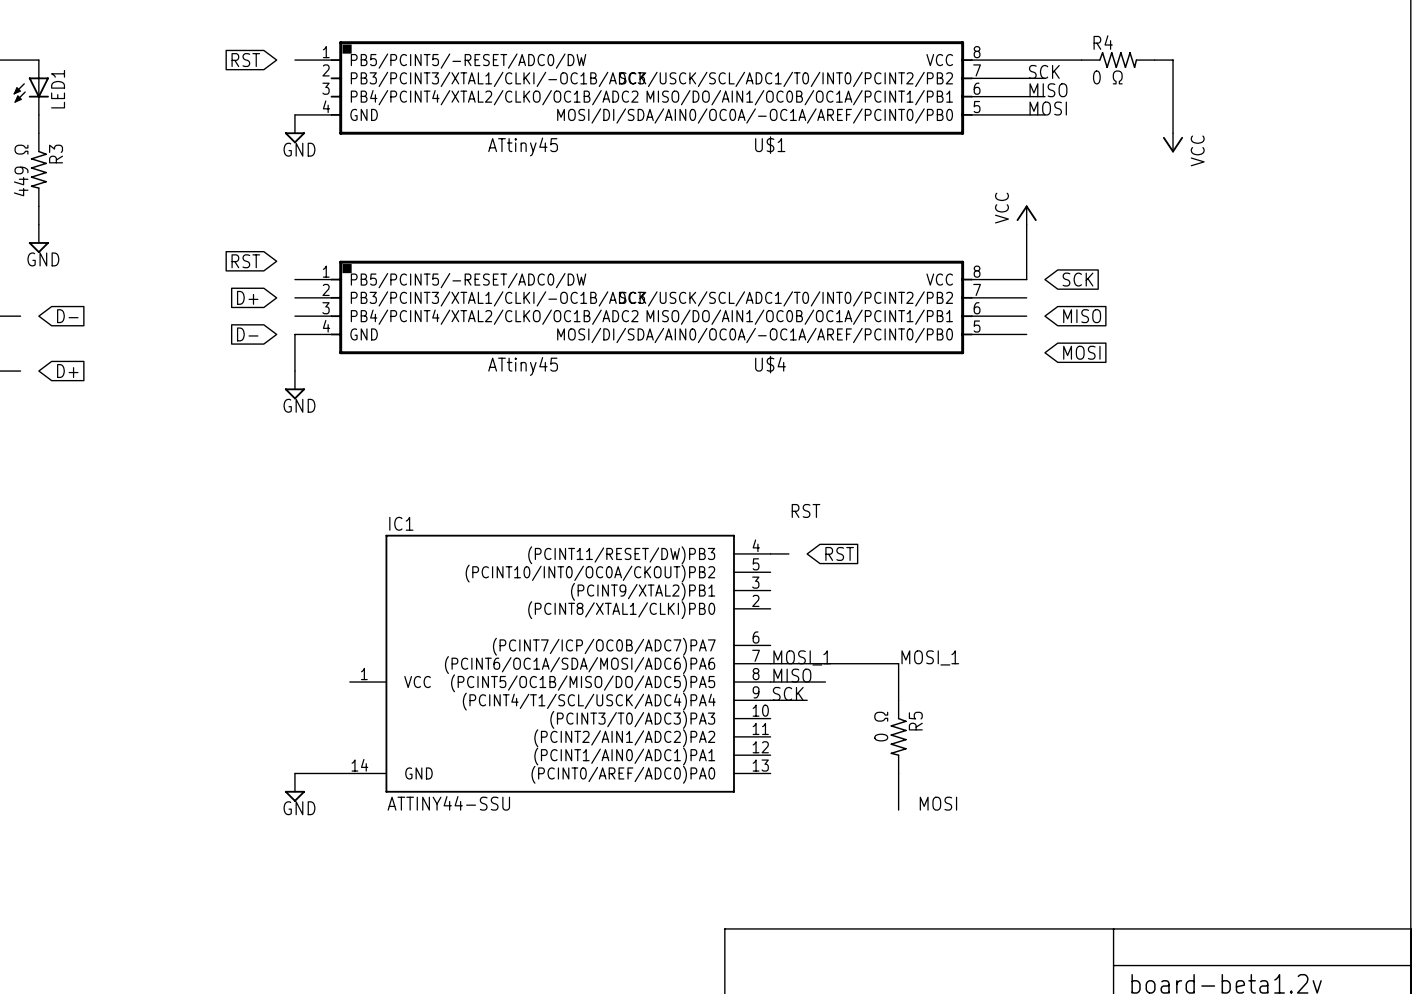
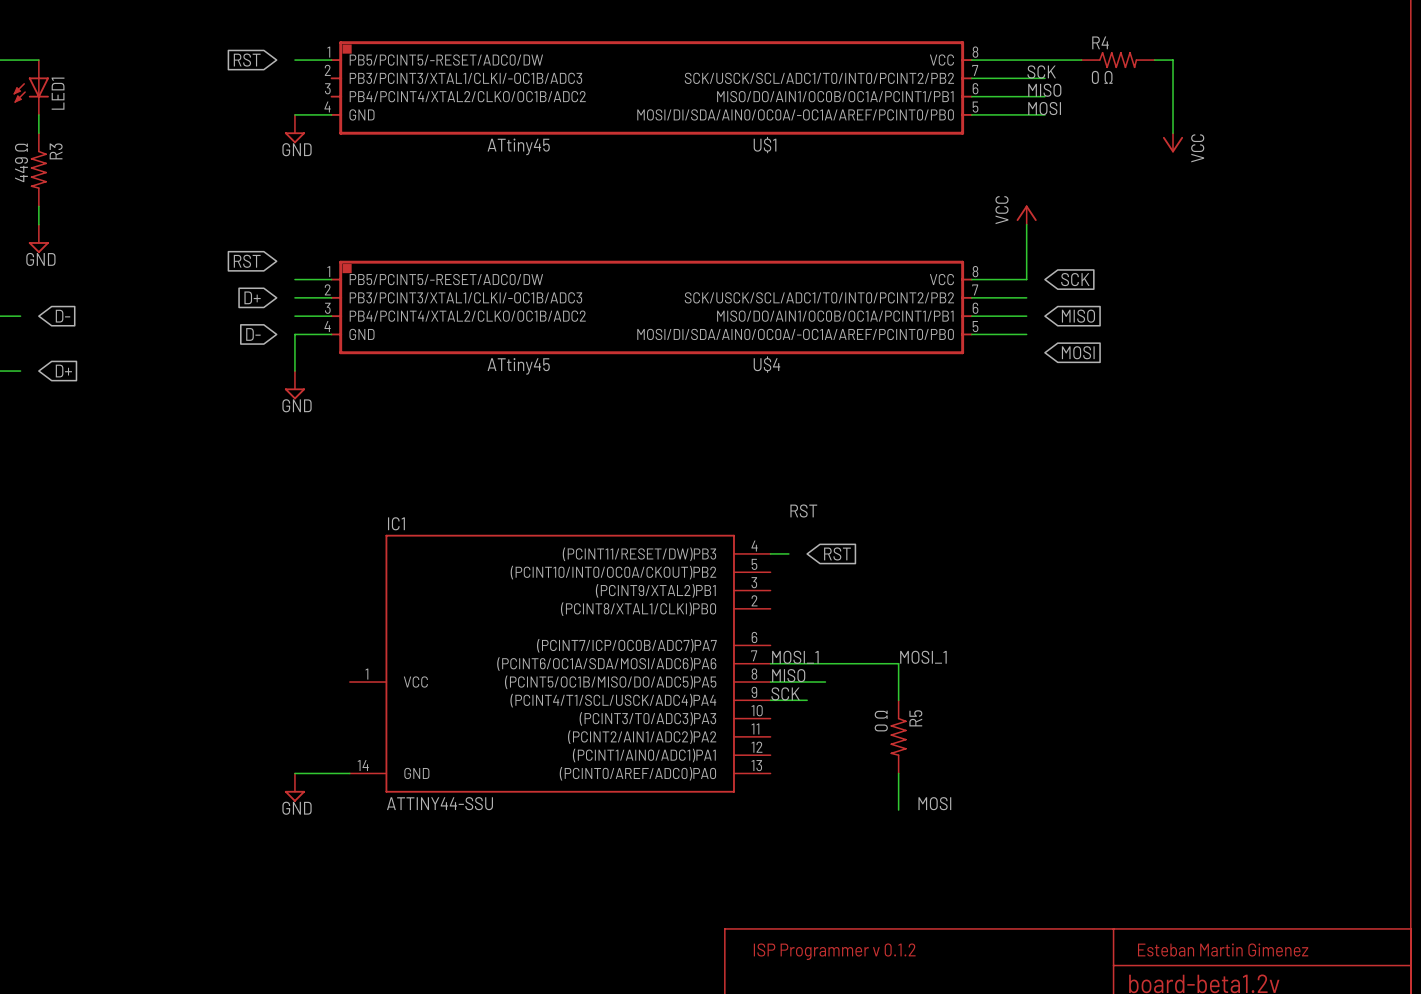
text: none -> Esteban Martin Gimenez (1223, 949)
text: none -> ISP Programmer v 0.1.2 (834, 951)

